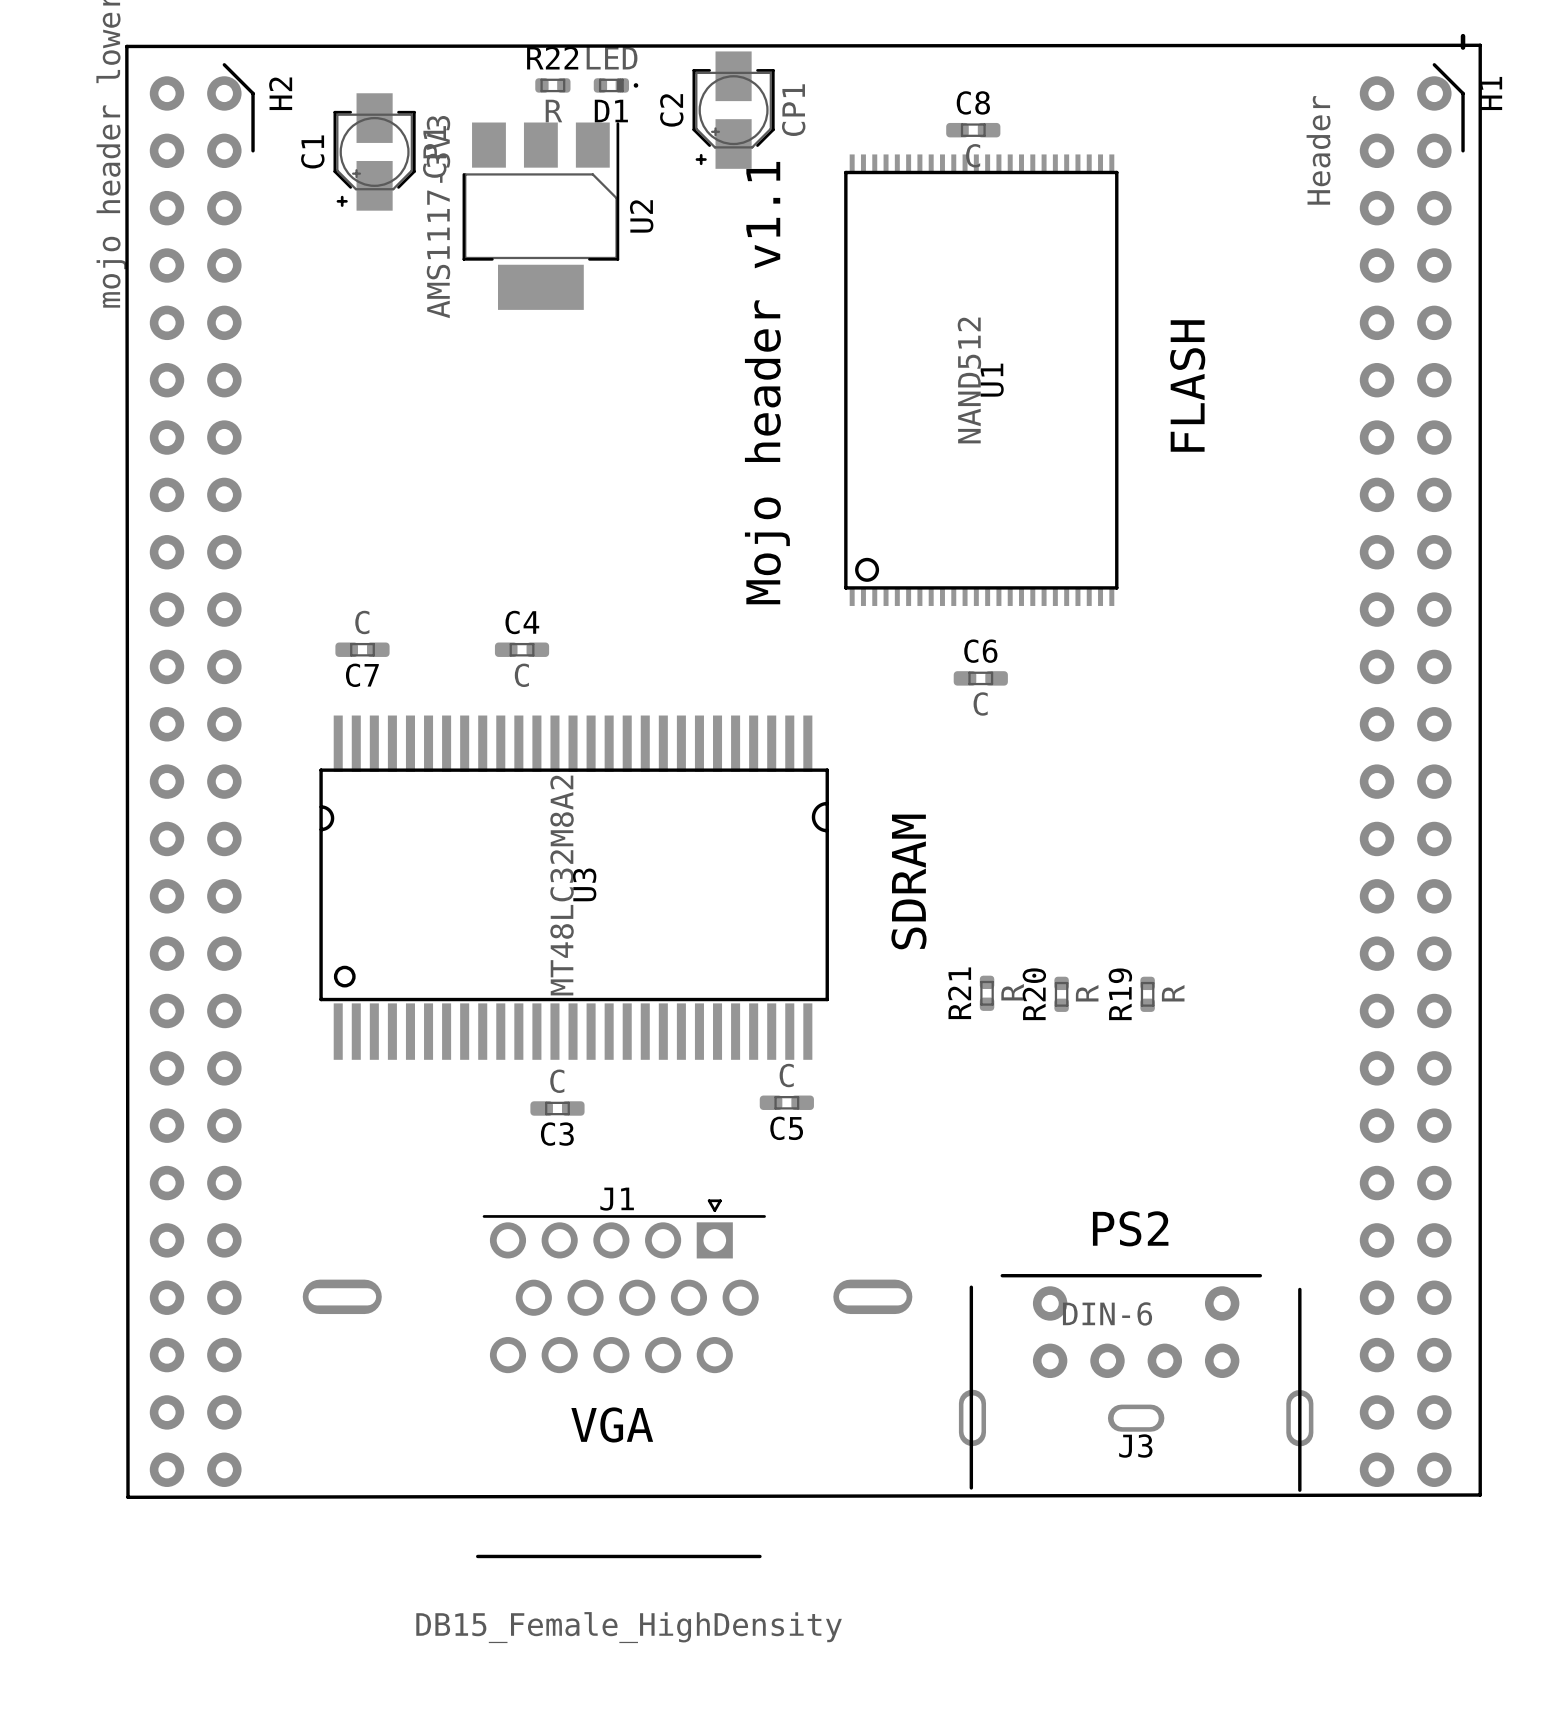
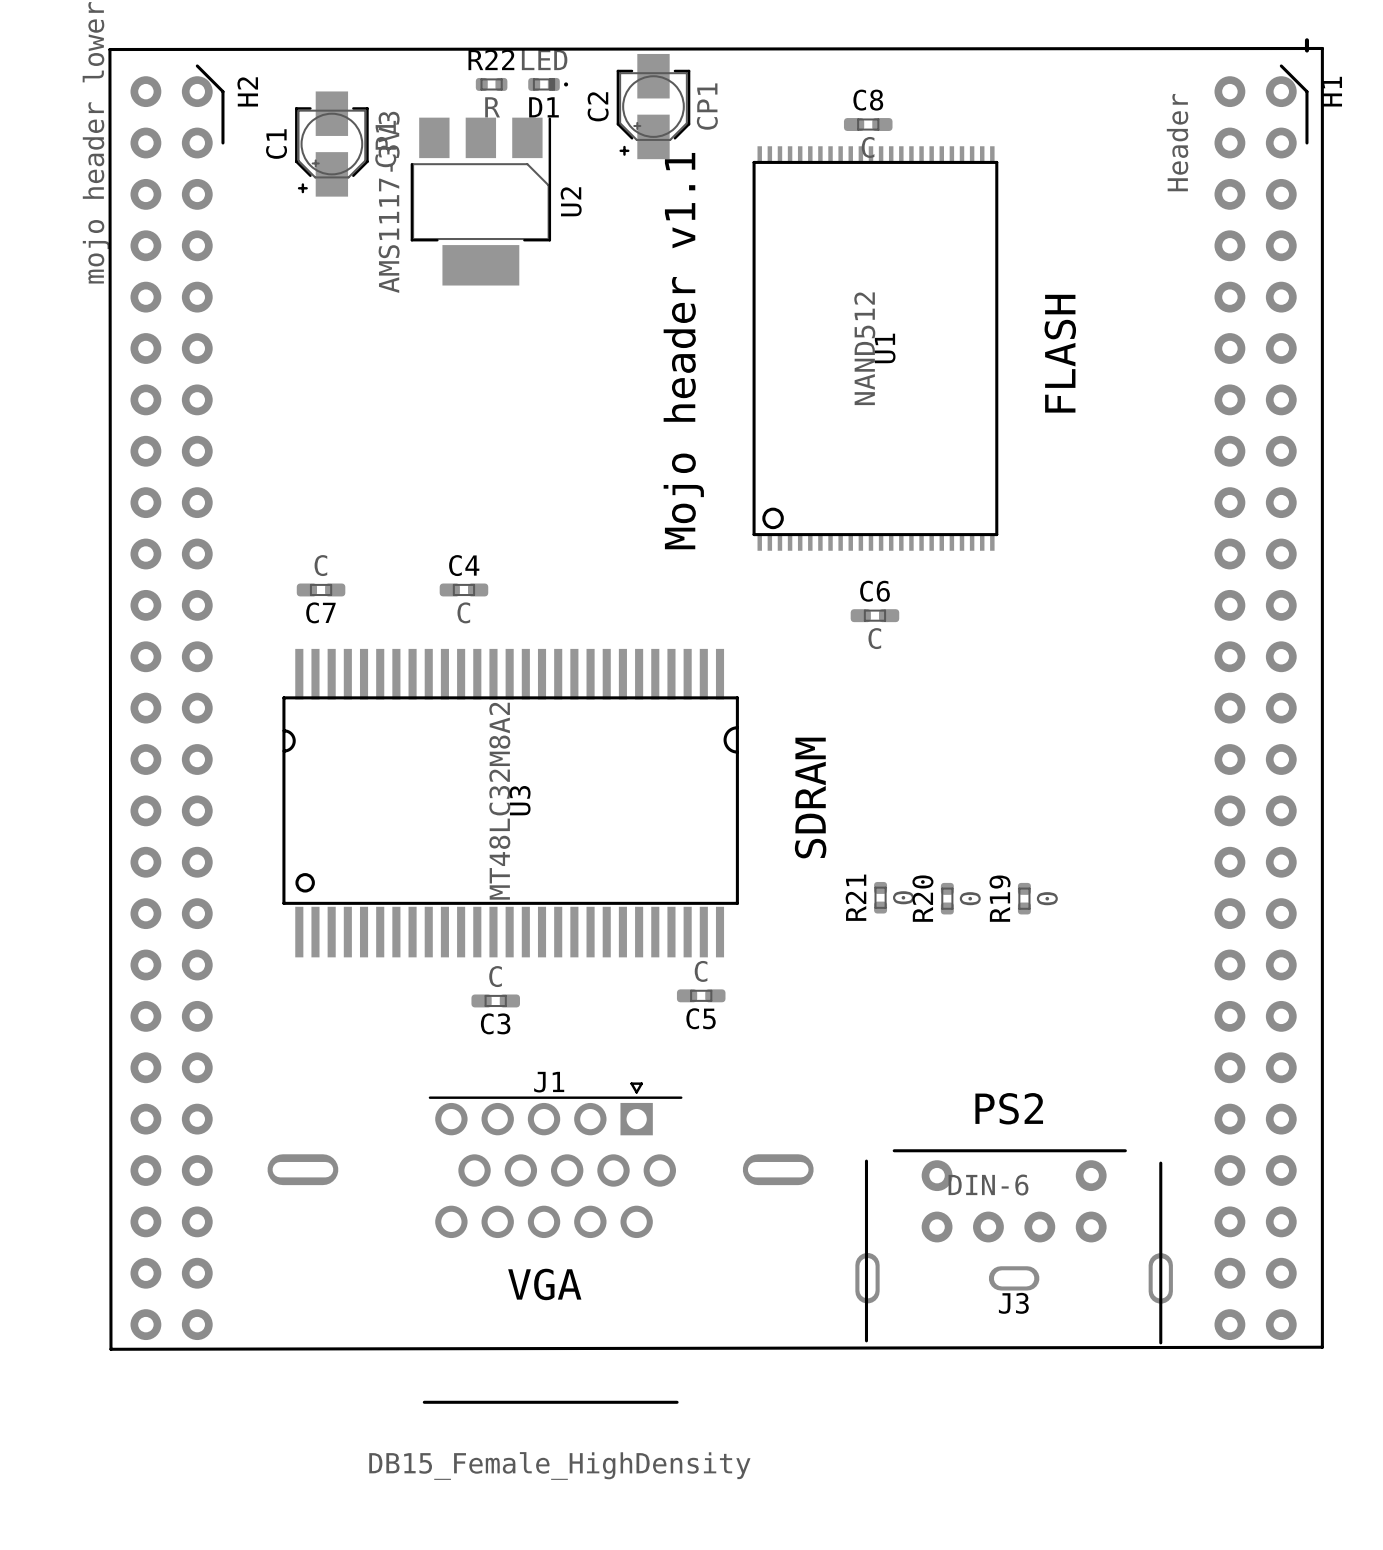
R21 value: R (1012, 992) -> 0 (903, 897)
R20 value: R (1087, 993) -> 0 (970, 898)
R19 value: R (1173, 993) -> 0 (1047, 898)

